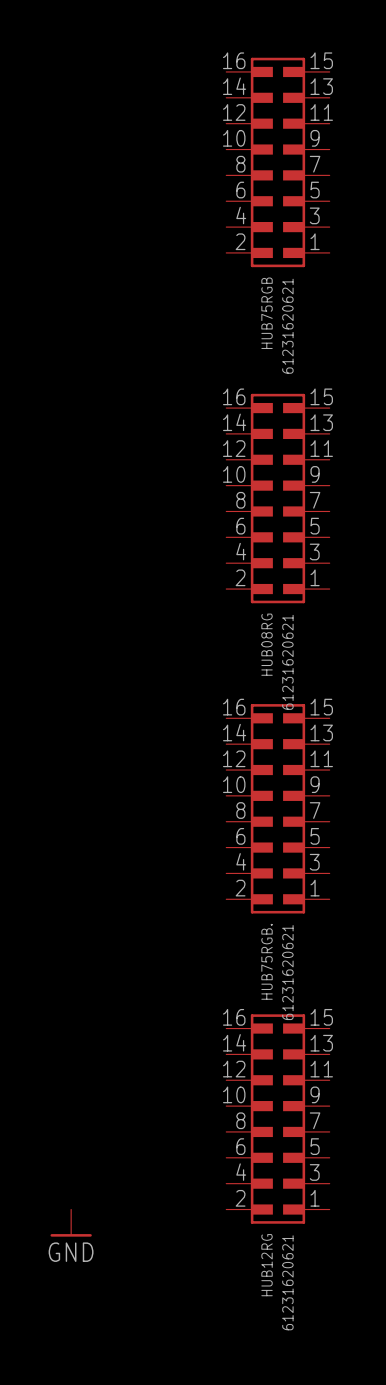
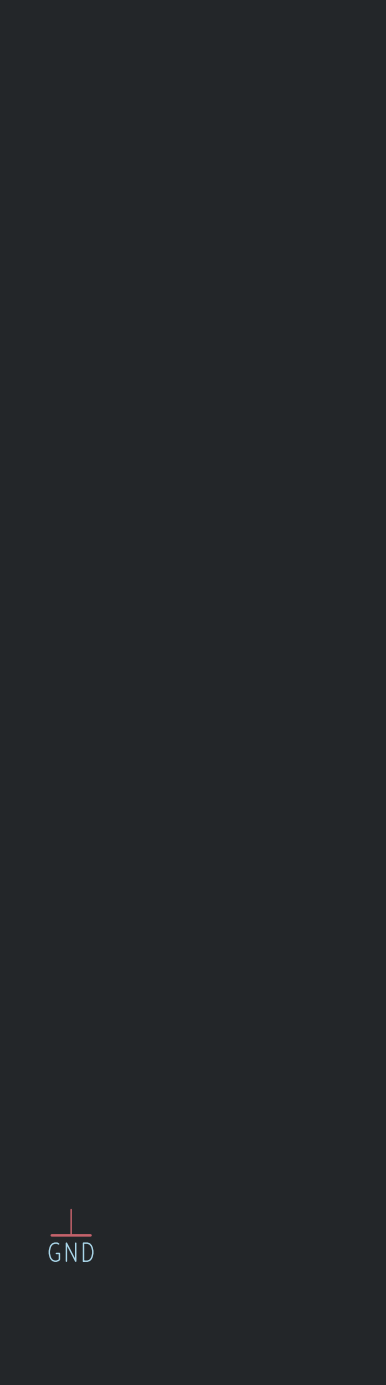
HUB75RGB: 61231620621 (277, 162) -> none
HUB08RG: 61231620621 (277, 498) -> none
HUB75RGB.: 61231620621 (277, 808) -> none
HUB12RG: 61231620621 (277, 1119) -> none

